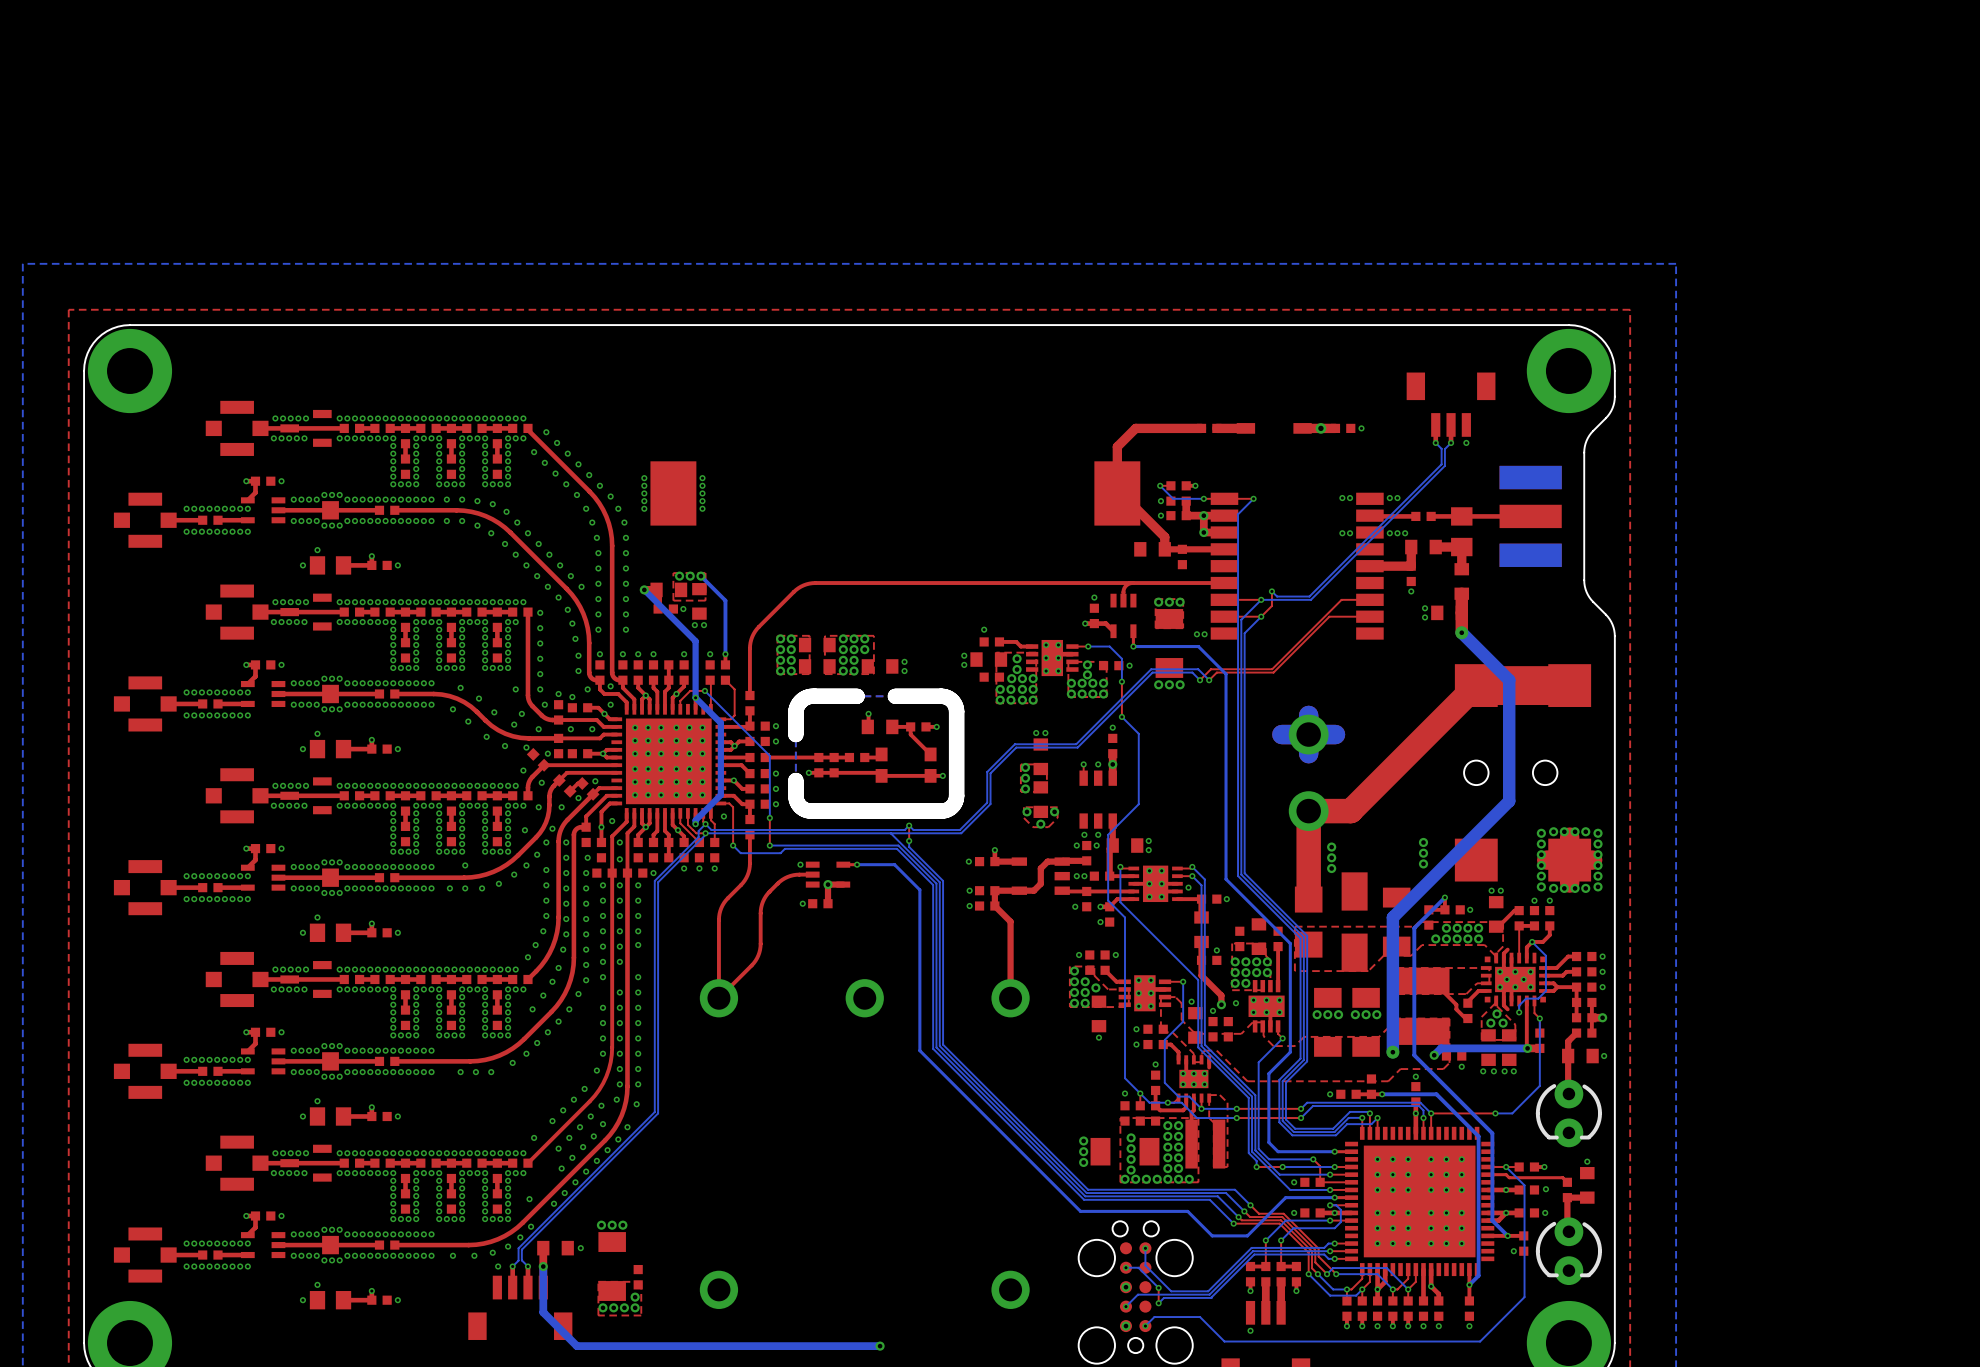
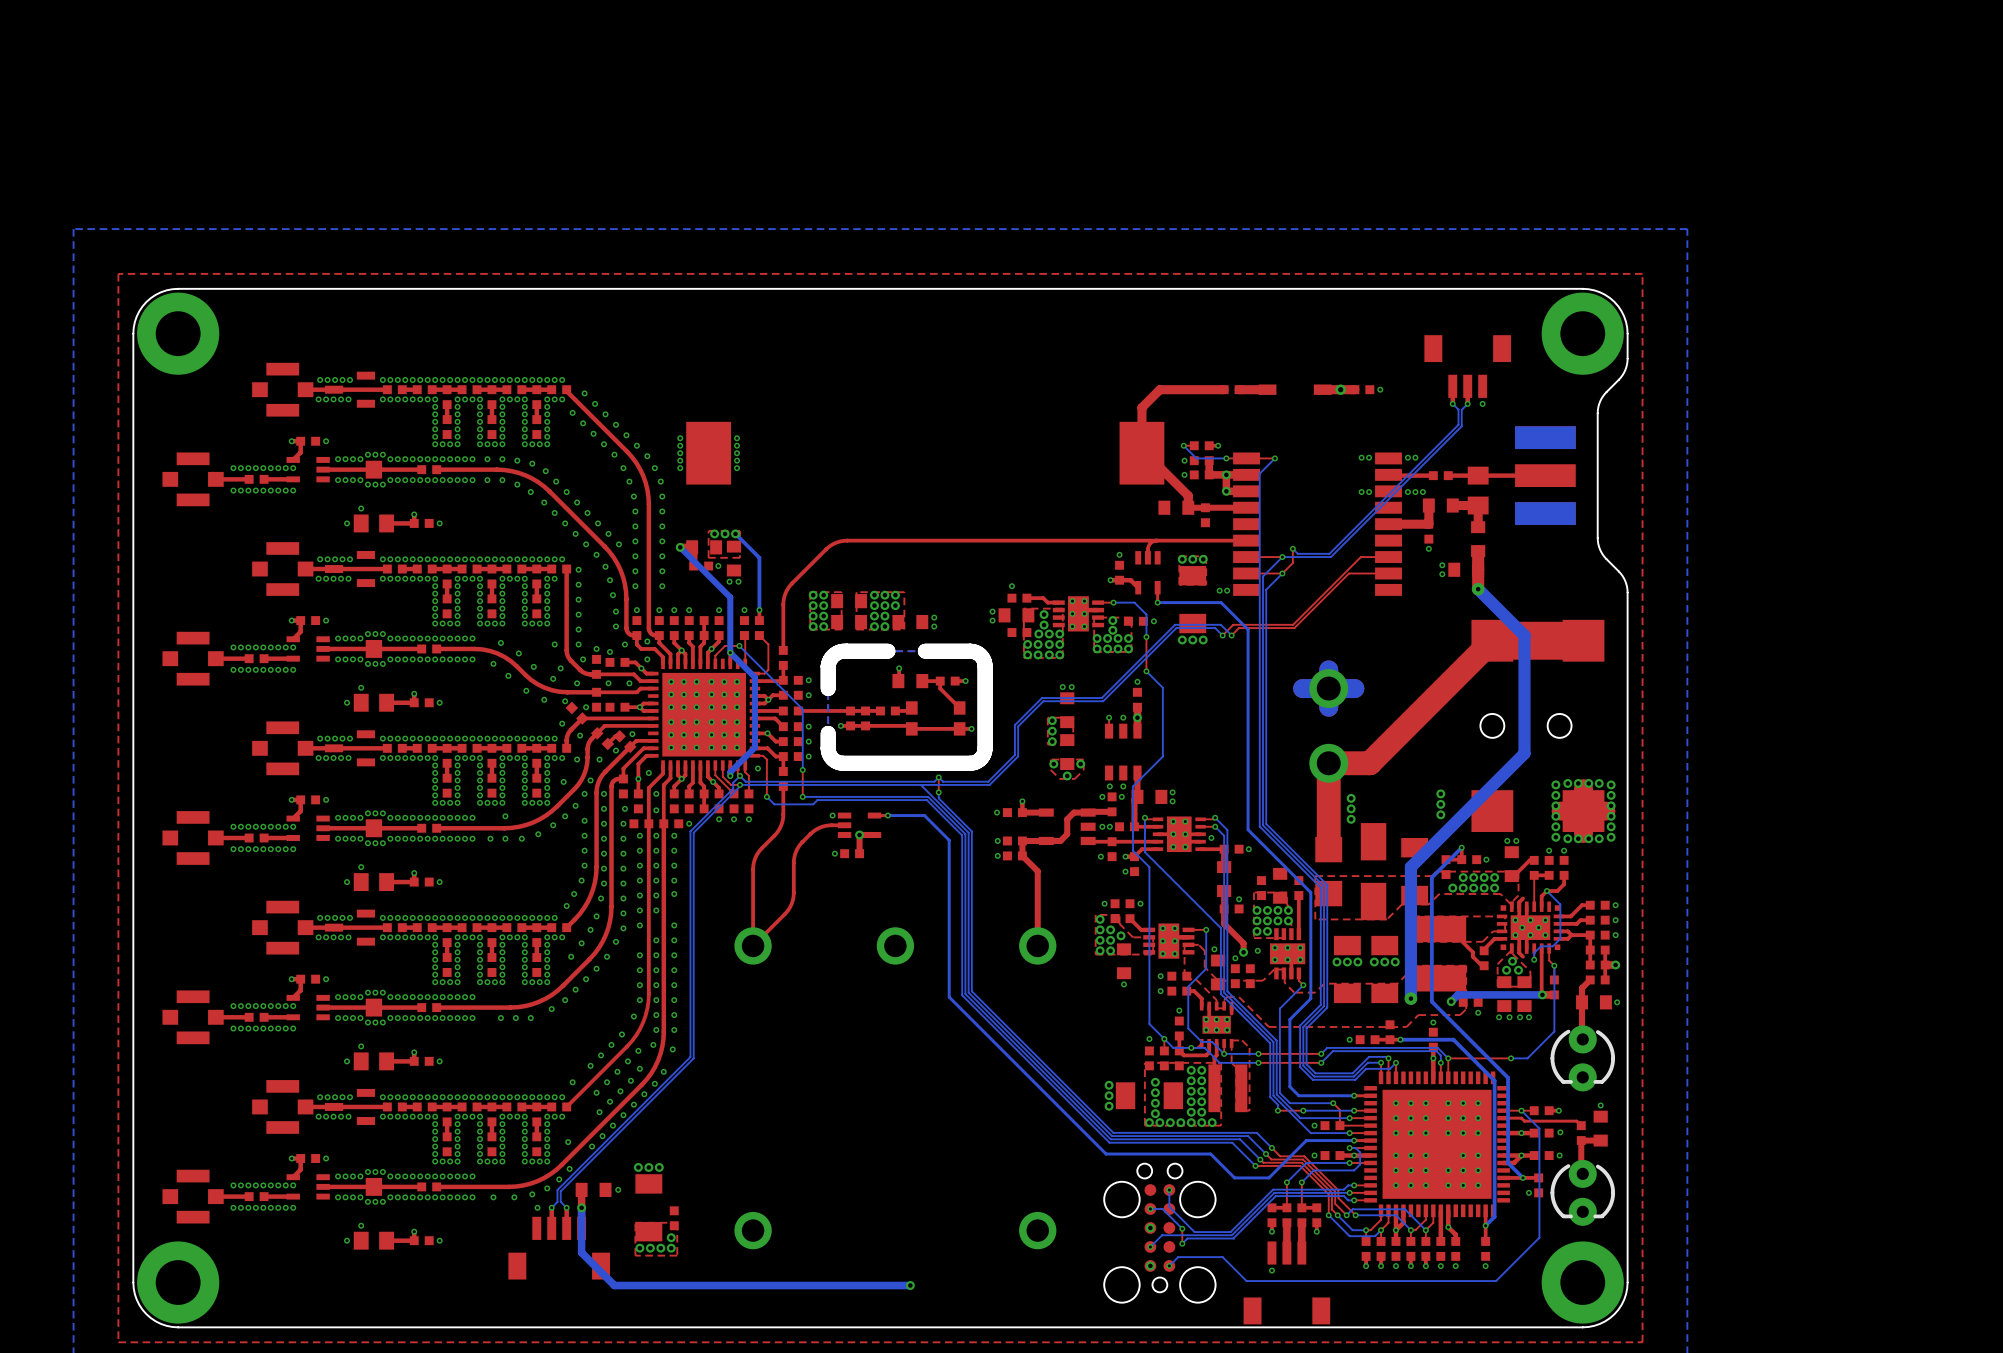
via: (1431, 1212) -> none

